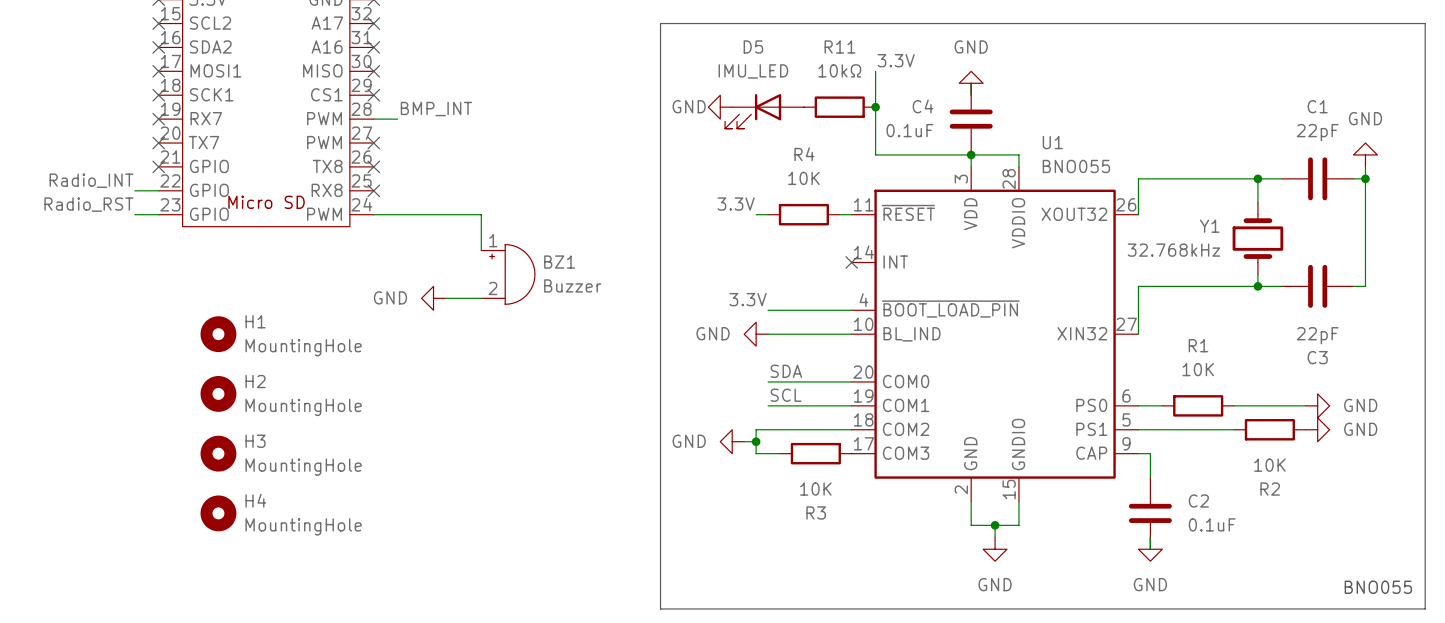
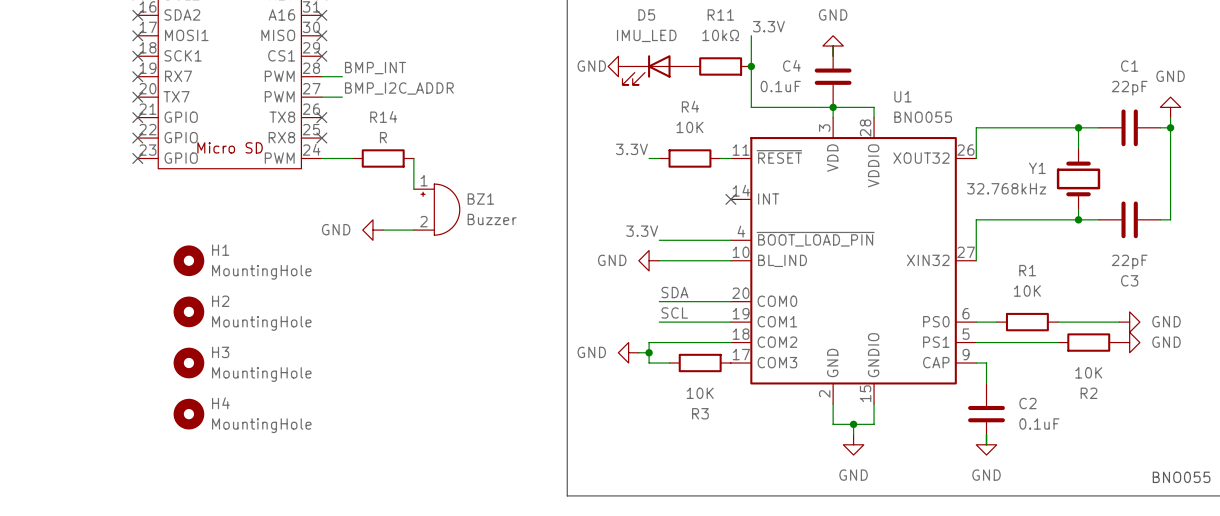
label: none -> BMP_I2C_ADDR (399, 88)
wire: none -> (321, 97) (342, 97)
no-connect mark: (373, 143) -> none
label: Radio_INT (91, 180) -> none
wire: (134, 190) (158, 190) -> none
no-connect mark: none -> (137, 138)
label: Radio_RST (88, 204) -> none
wire: (134, 214) (158, 214) -> none
no-connect mark: none -> (137, 158)
wire: (409, 214) (481, 214) -> none
R14: none -> R (383, 158)

